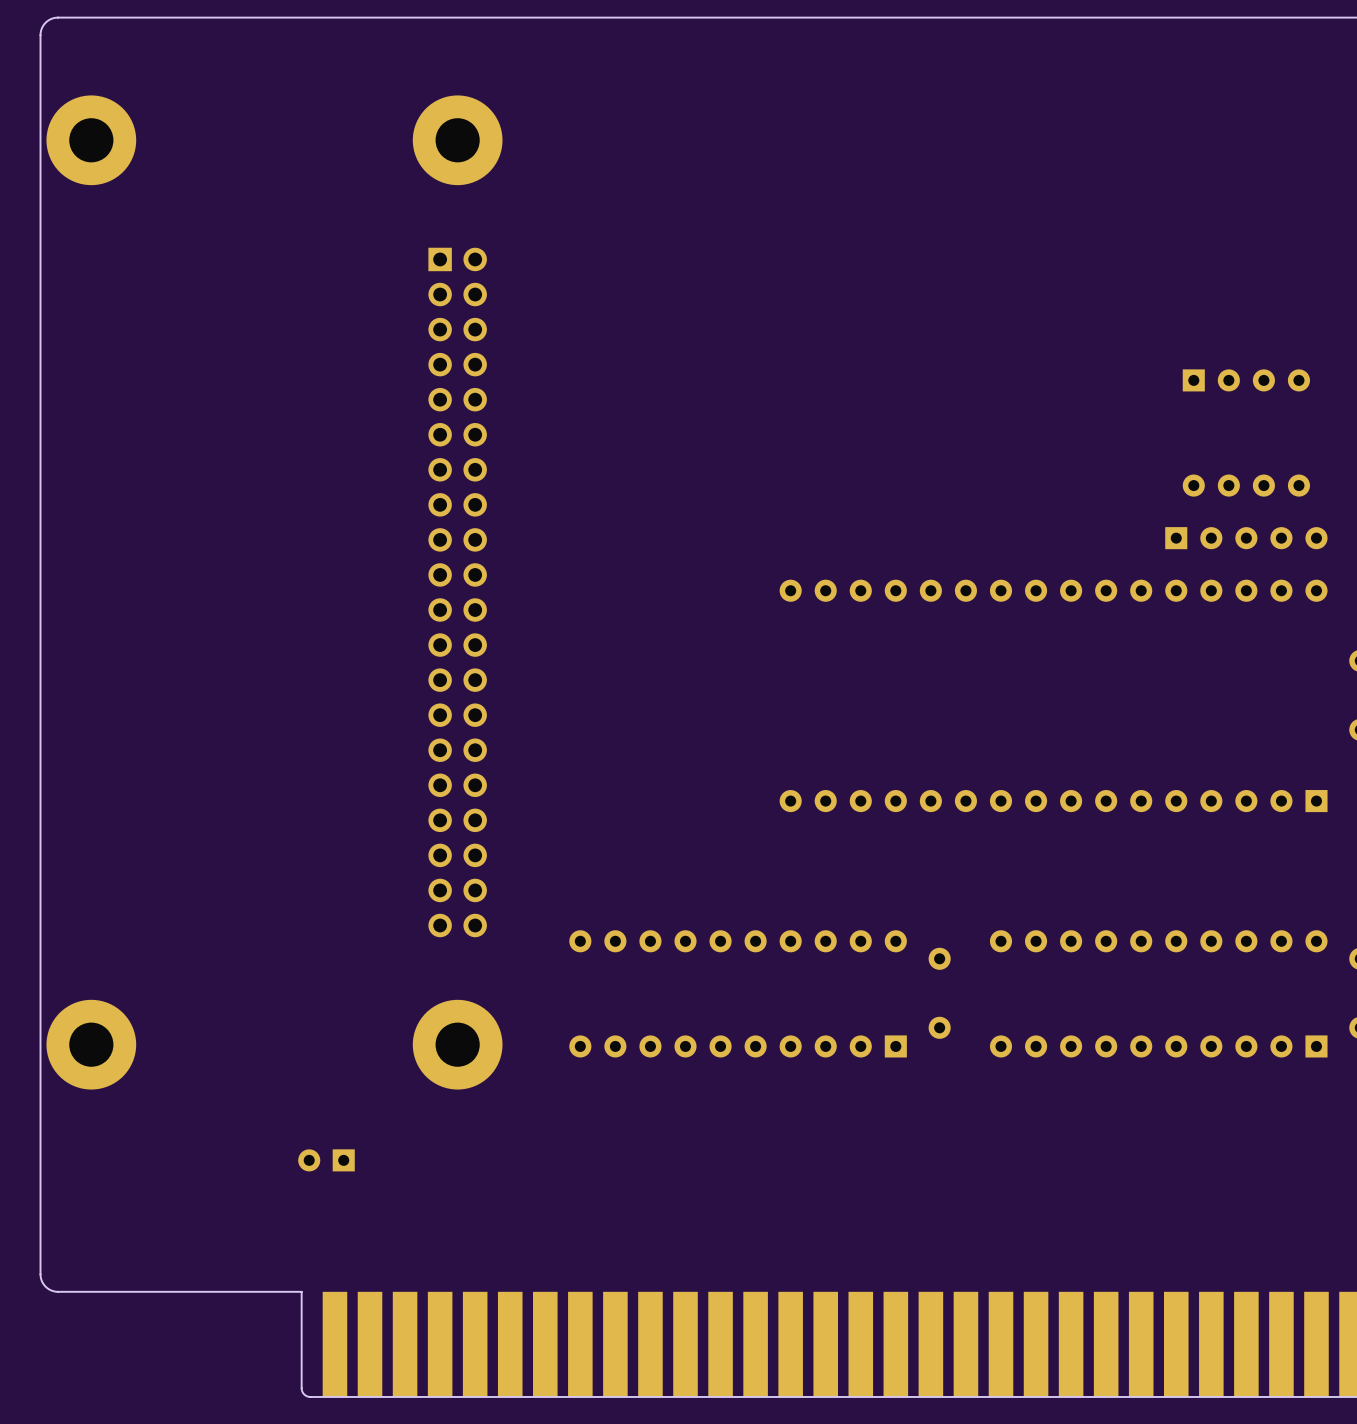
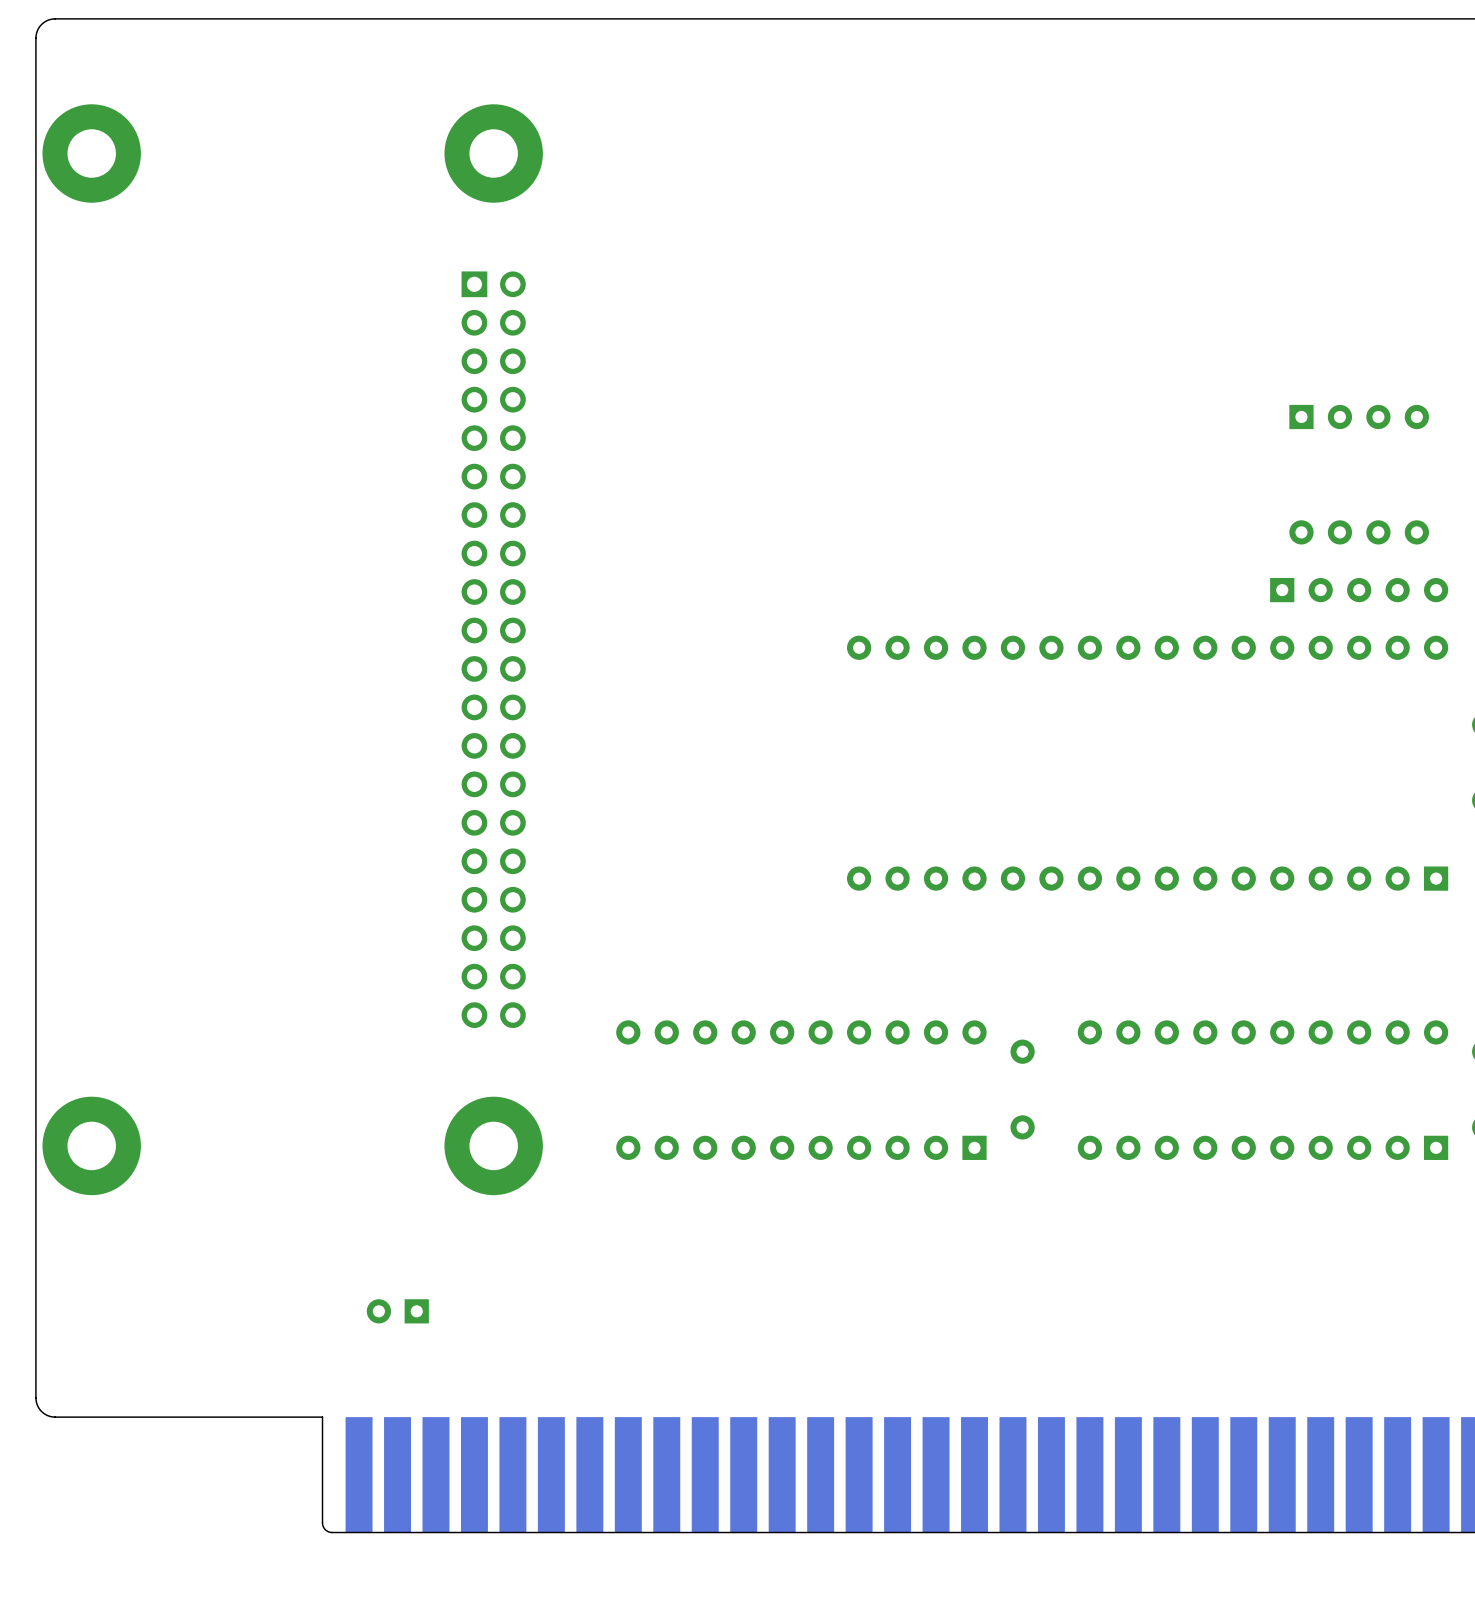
part position: (326, 1160) -> (397, 1311)

